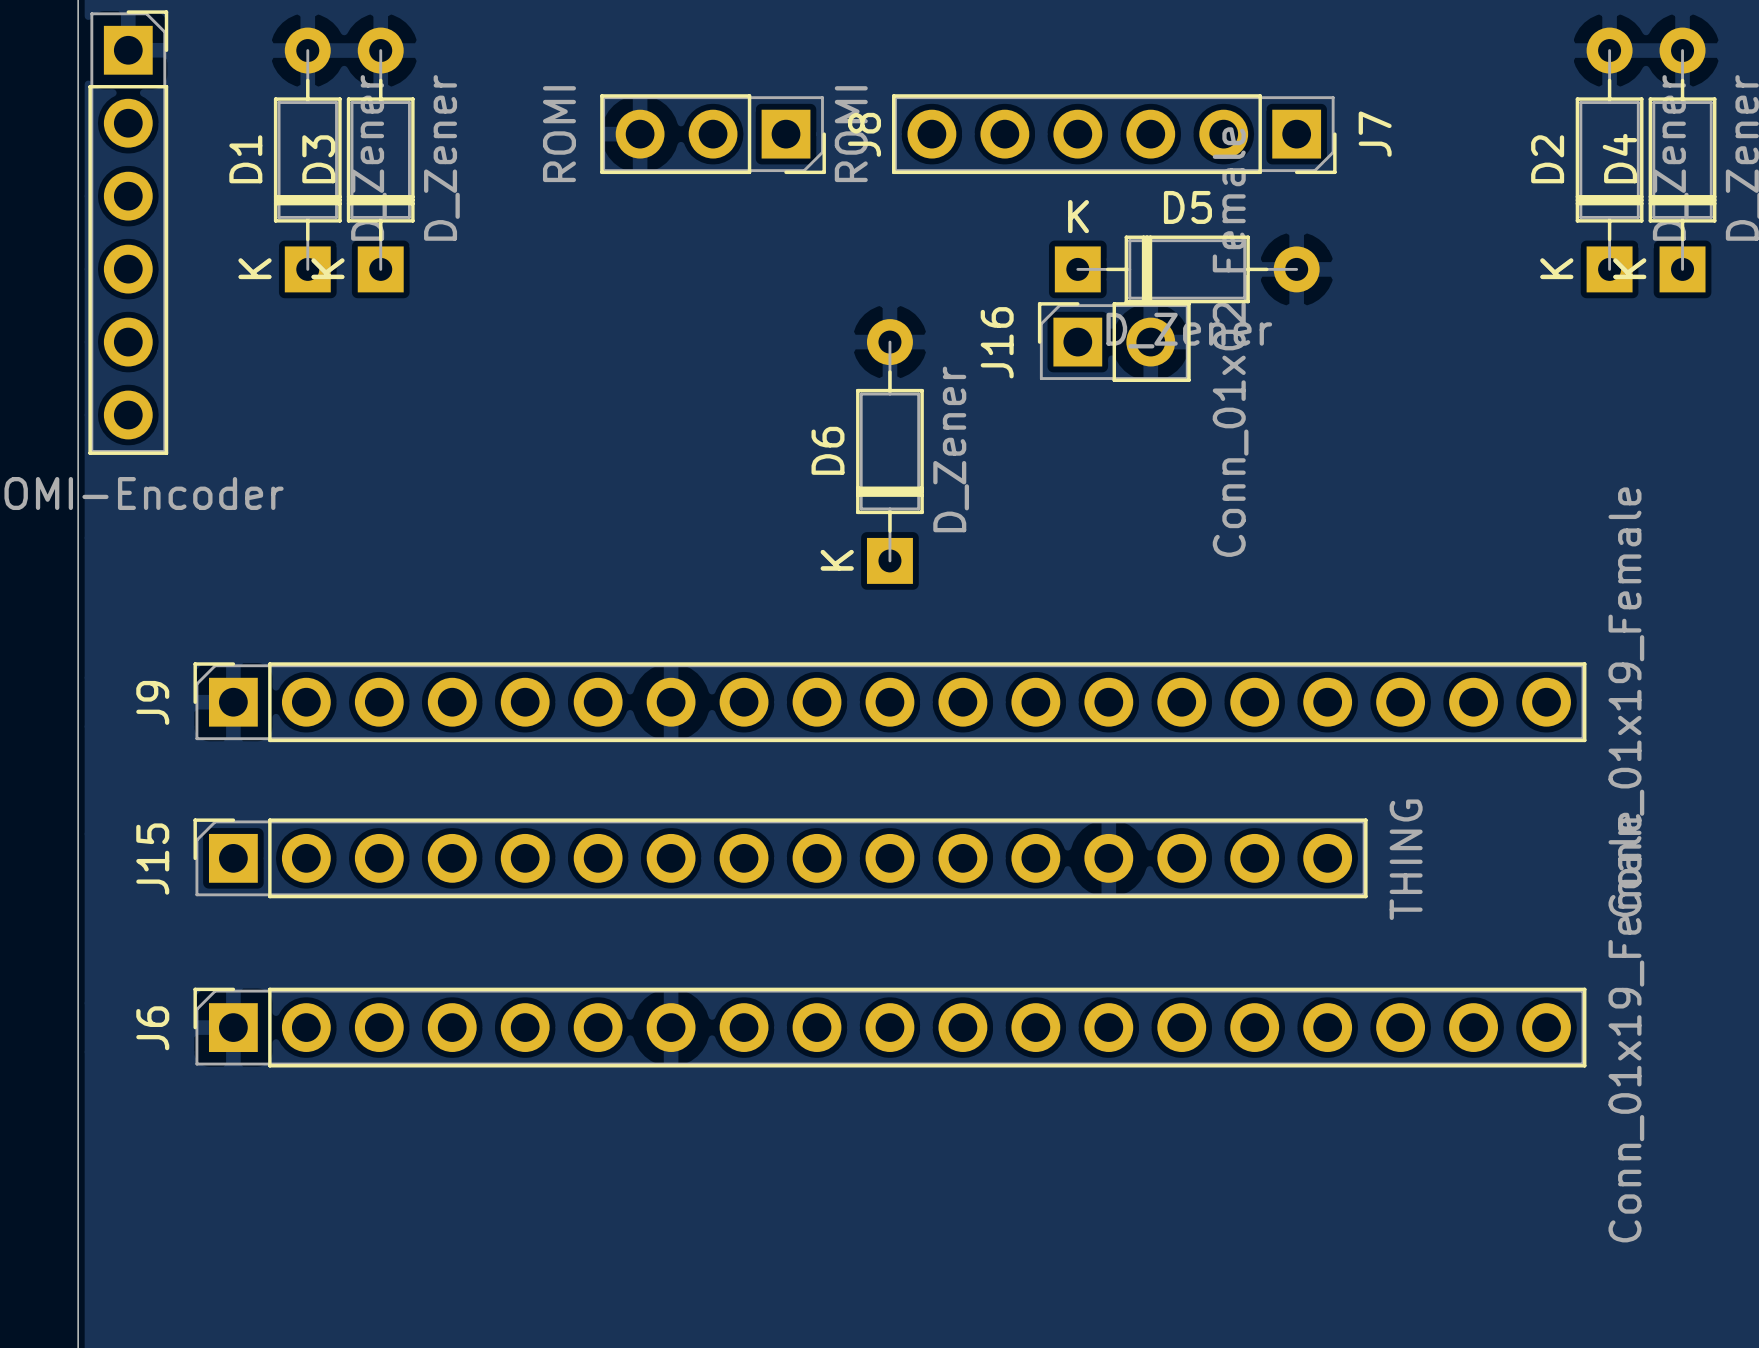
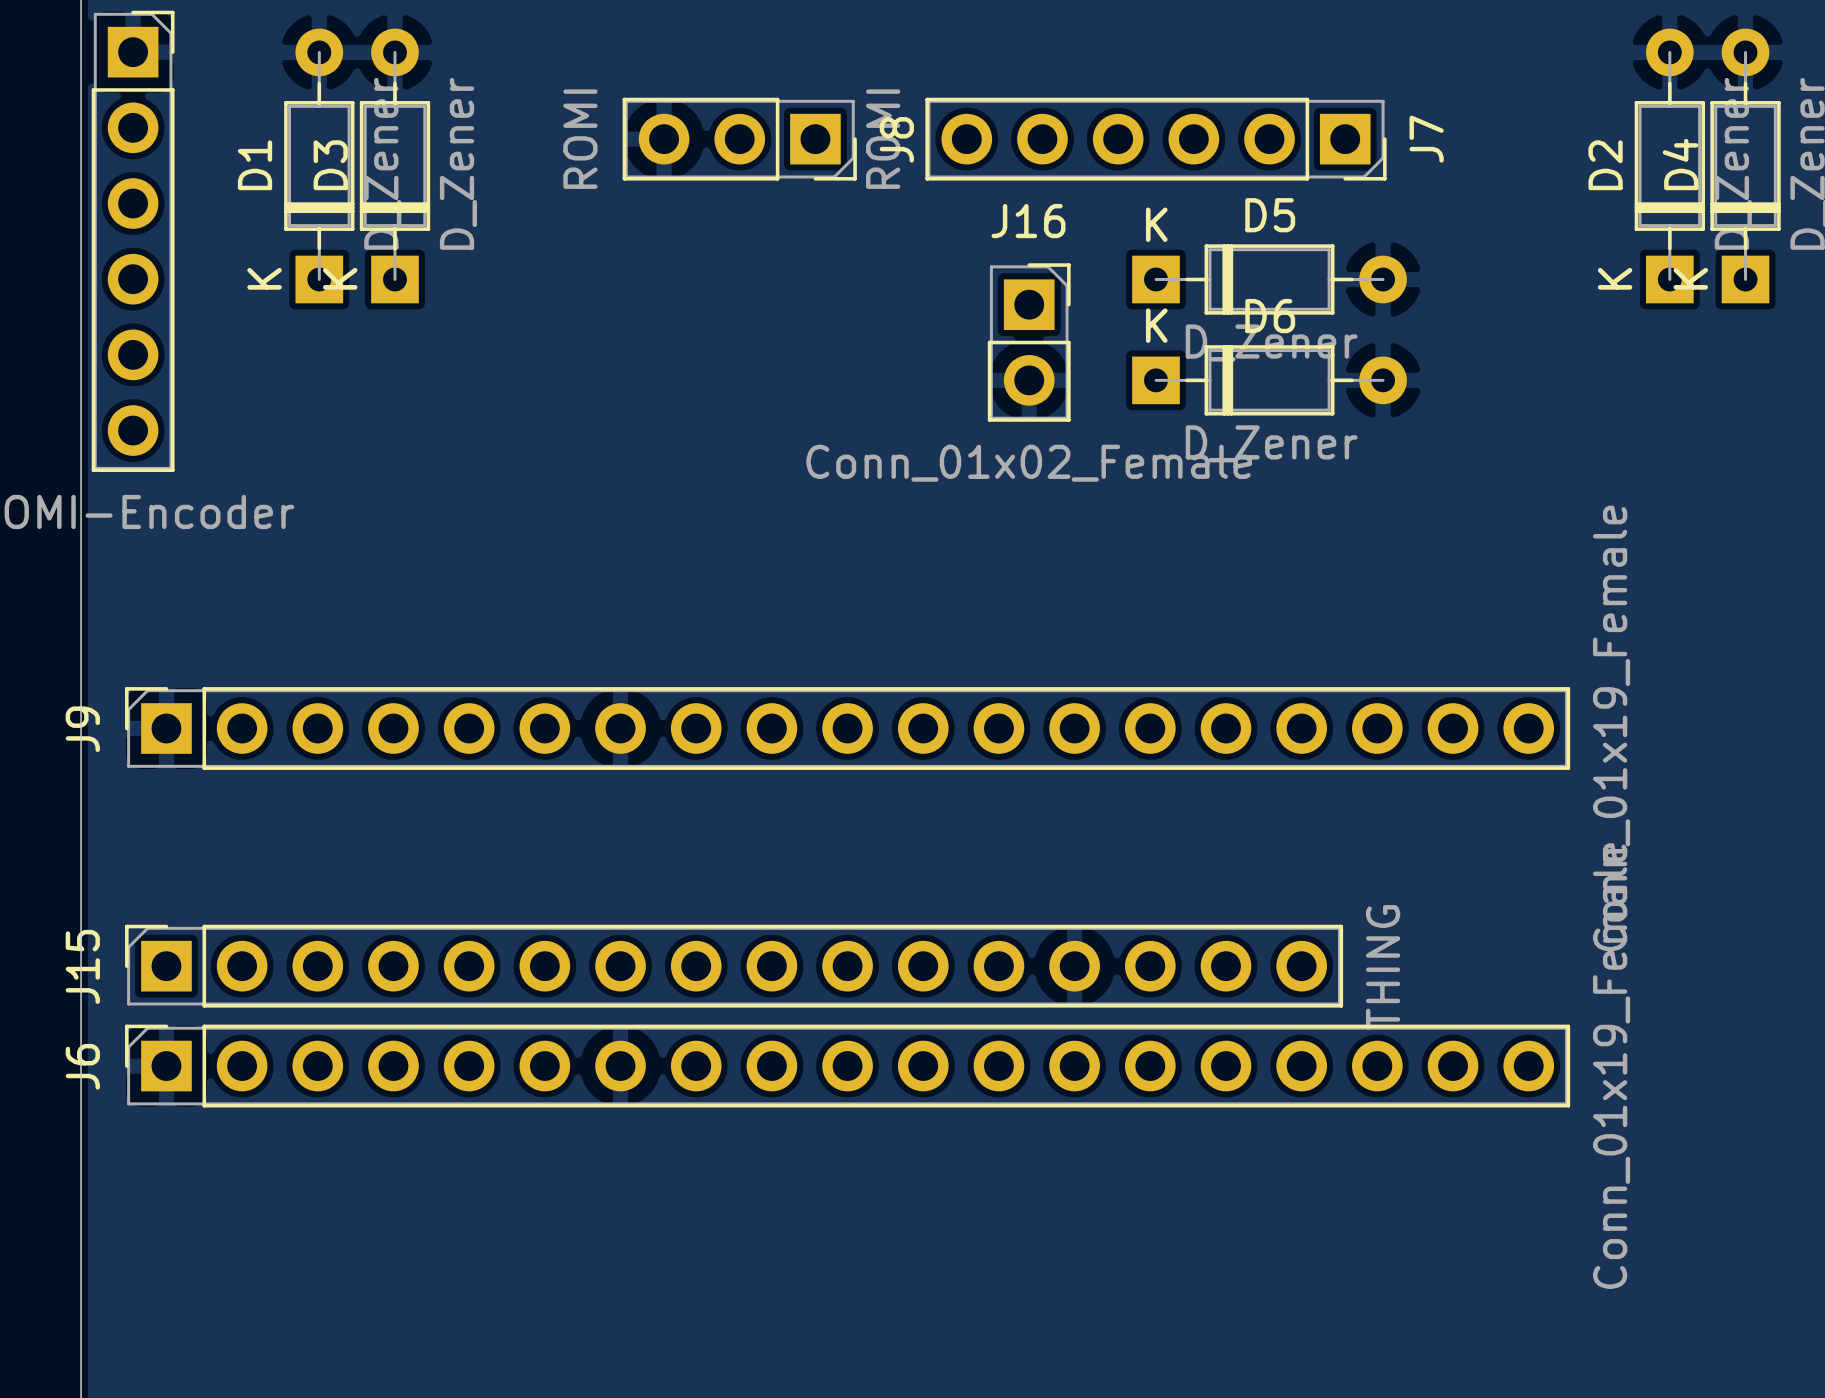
D5 position: (1187, 269) -> (1269, 279)
J16 rotation: 0° (1114, 342) -> 90° clockwise (1029, 342)
J16 position: (1114, 342) -> (1029, 342)
D6 rotation: 0° (889, 451) -> 90° clockwise (1269, 380)
D6 position: (889, 451) -> (1269, 380)
J9 position: (889, 702) -> (847, 728)
J15 position: (780, 858) -> (734, 966)
J6 position: (889, 1027) -> (847, 1066)

